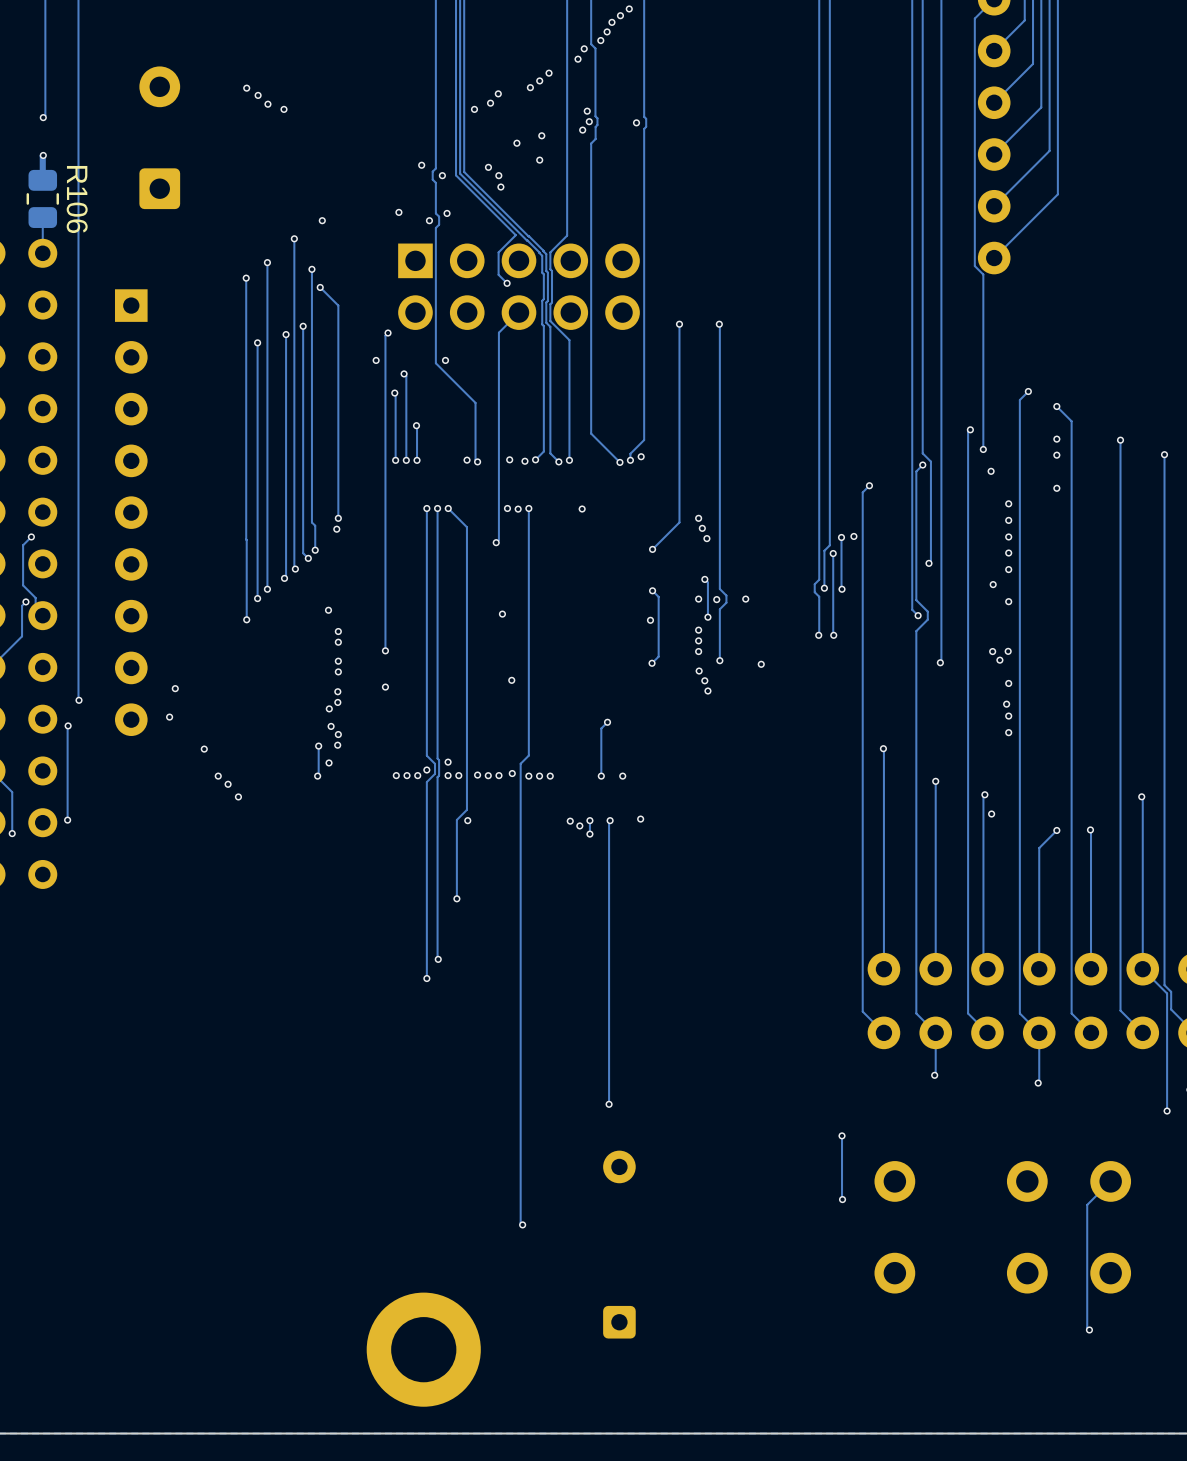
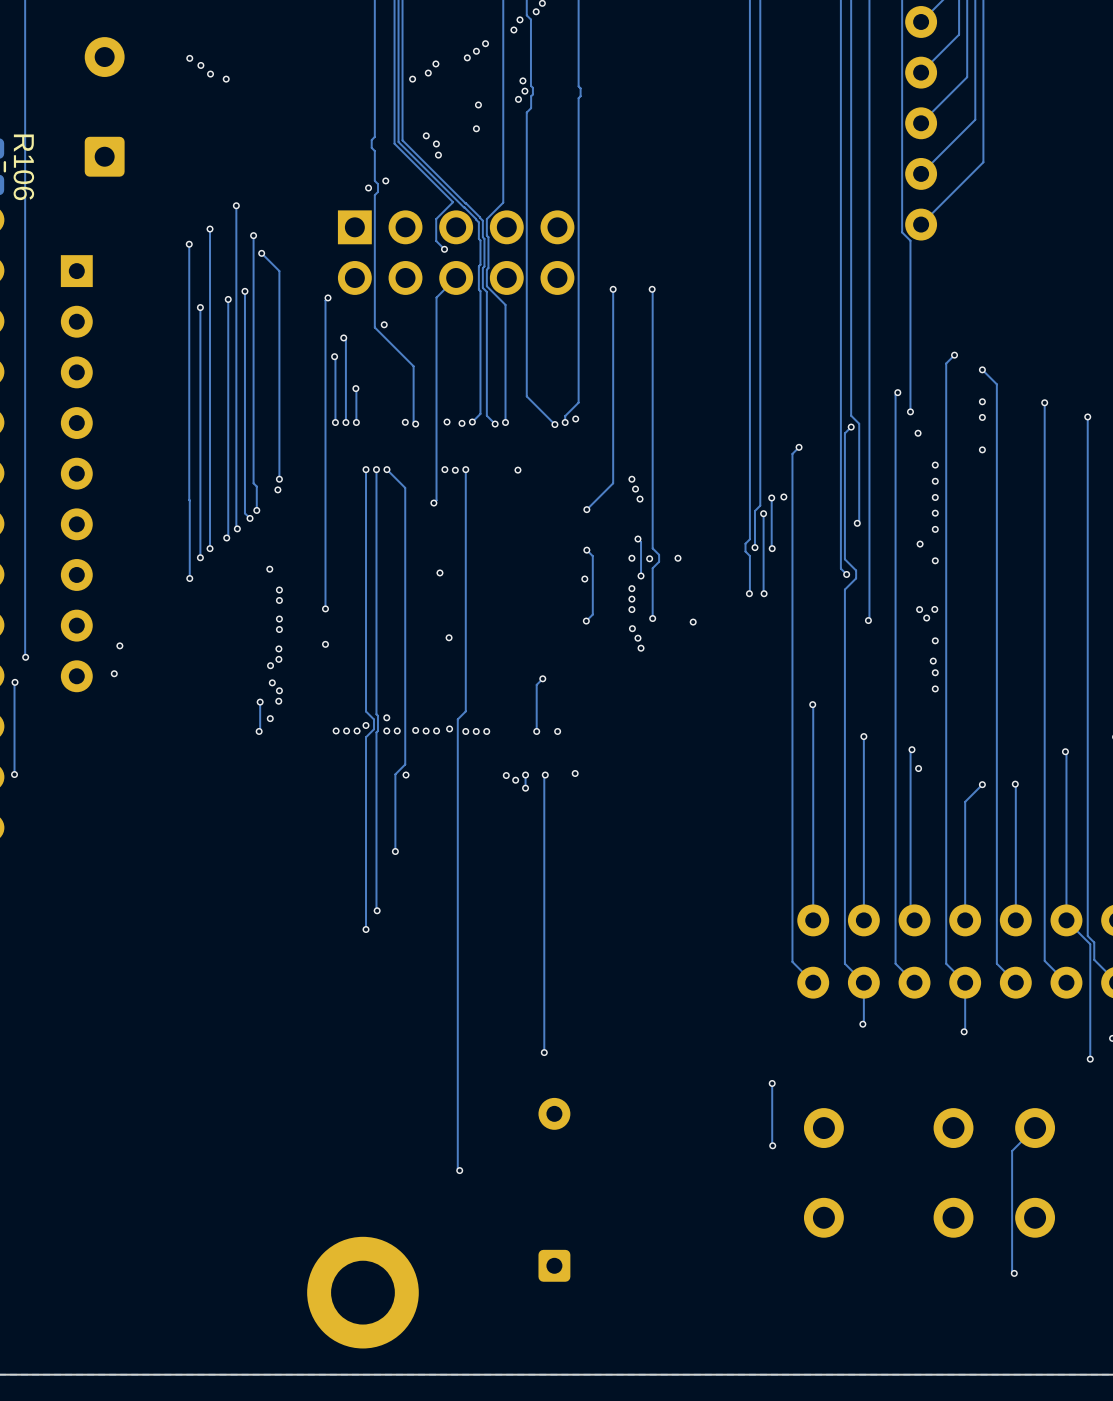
via: (636, 122) -> none
via: (516, 143) -> none
via: (421, 165) -> none
via: (442, 175) -> none
via: (398, 212) -> none
via: (322, 220) -> none
via: (376, 360) -> none
via: (204, 749) -> none
via: (218, 776) -> none
via: (228, 784) -> none
via: (238, 796) -> none

